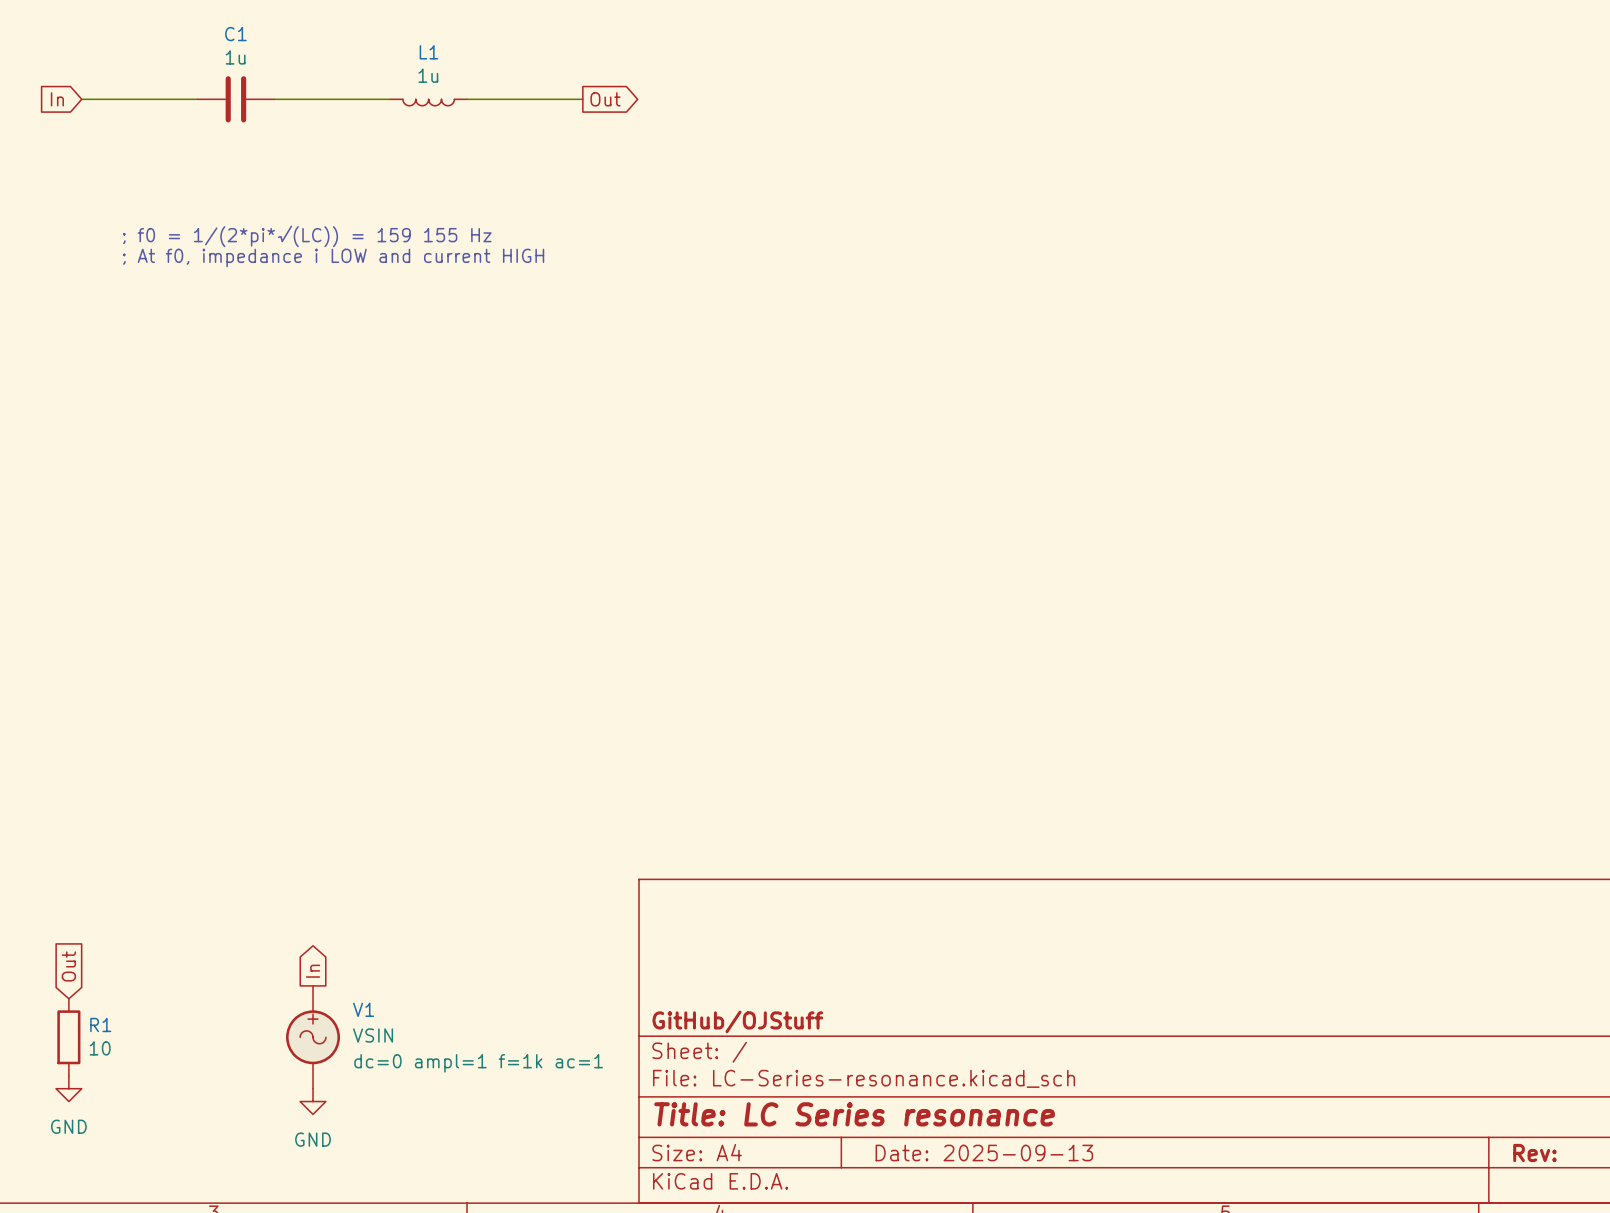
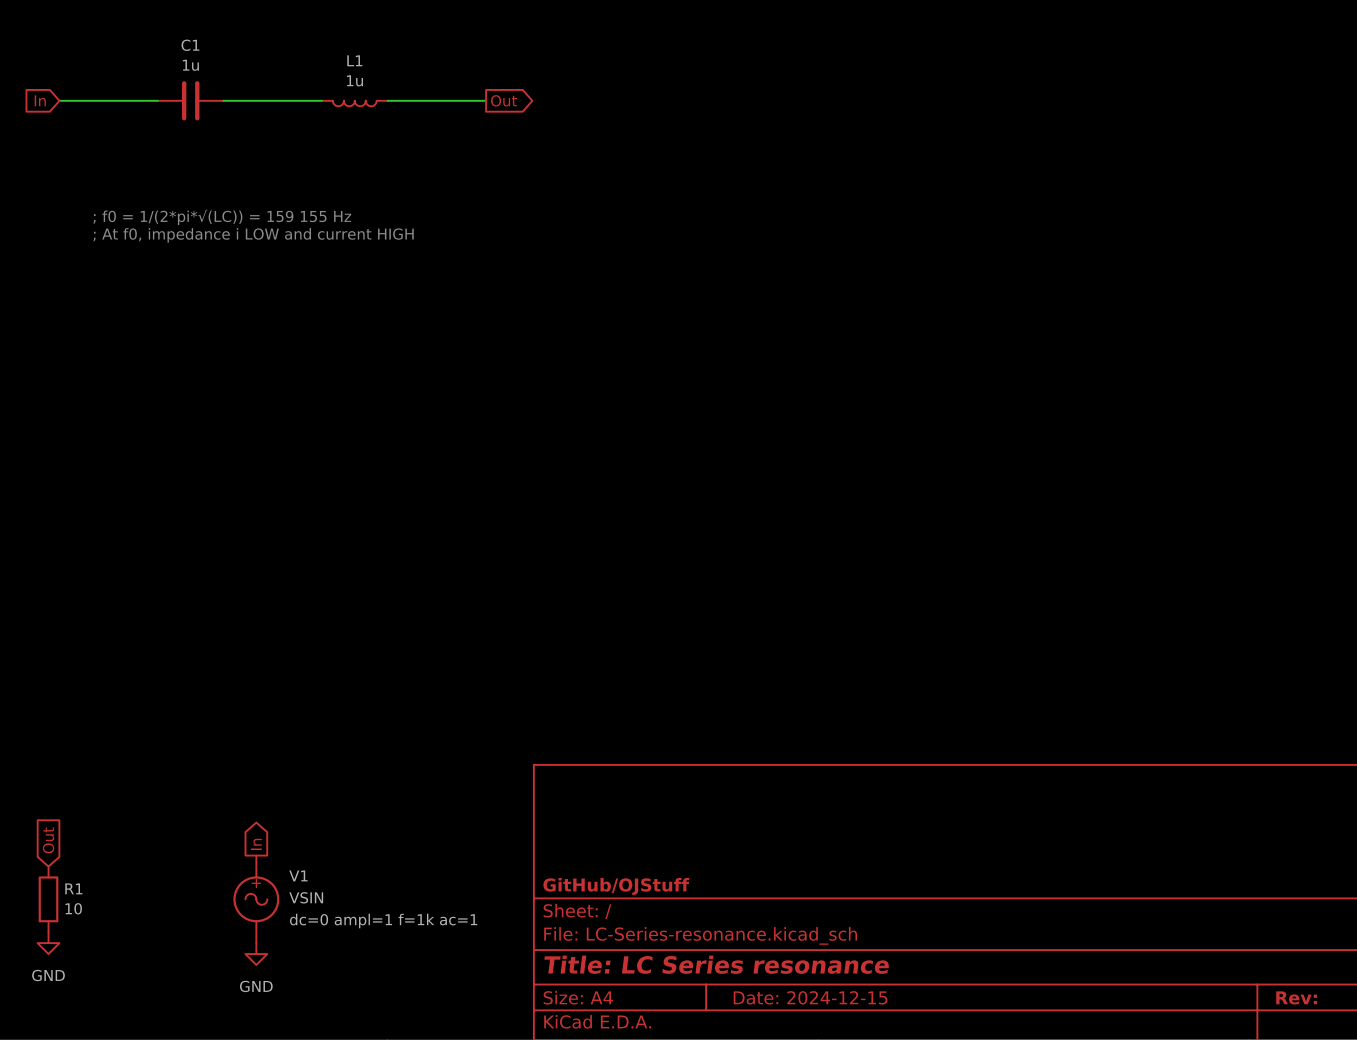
title block: Date: 2025-09-13 (984, 1152) -> Date: 2024-12-15 (810, 997)

